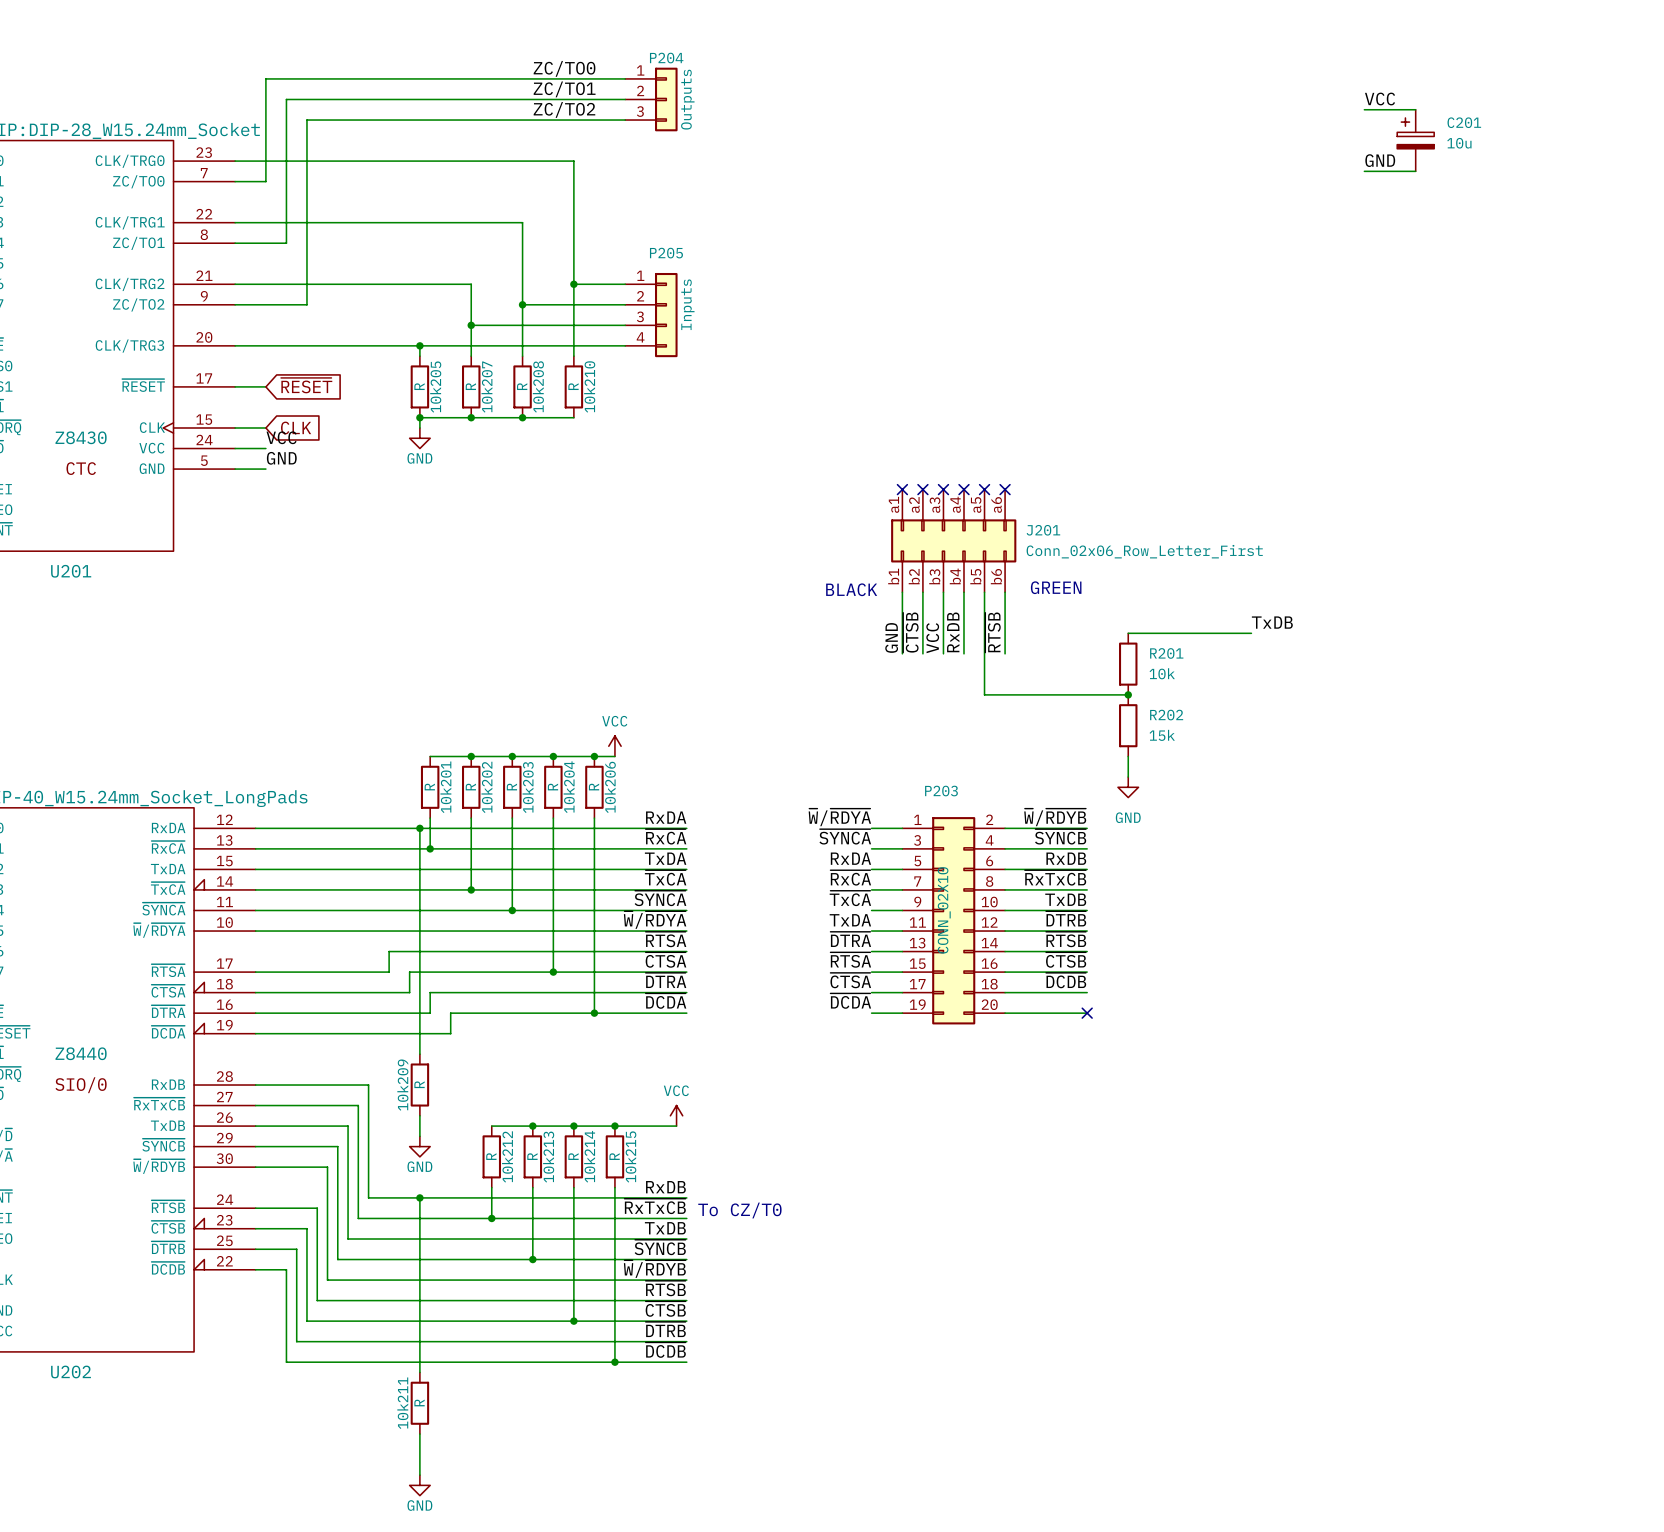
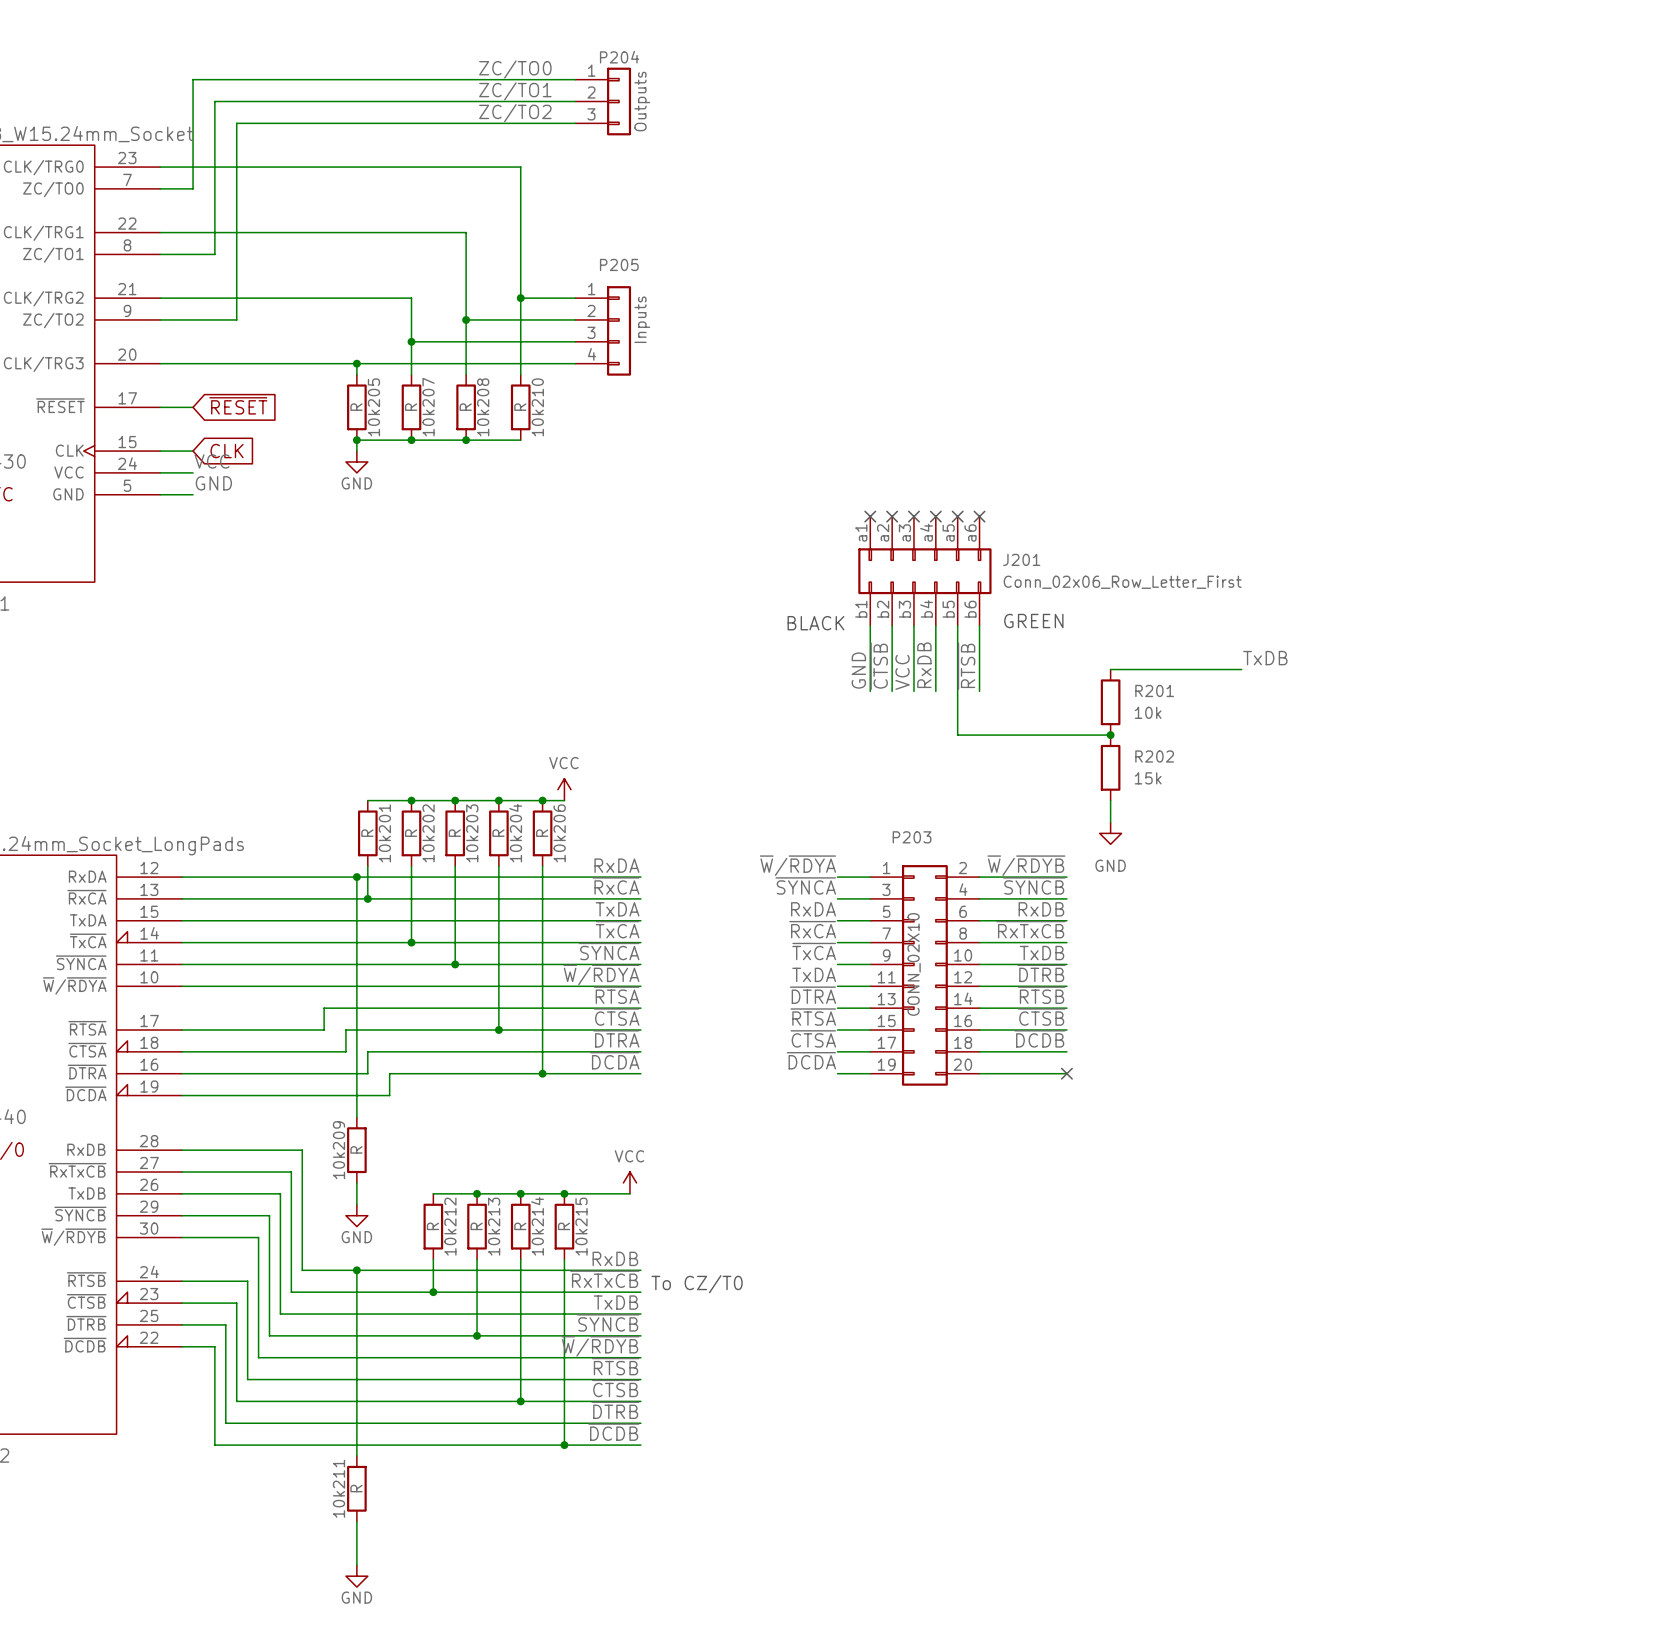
label: VCC (1380, 99) -> none
wire: (1364, 109) (1415, 109) -> none
C201: 10u (1415, 140) -> none
label: GND (1380, 160) -> none
wire: (1364, 171) (1415, 171) -> none

